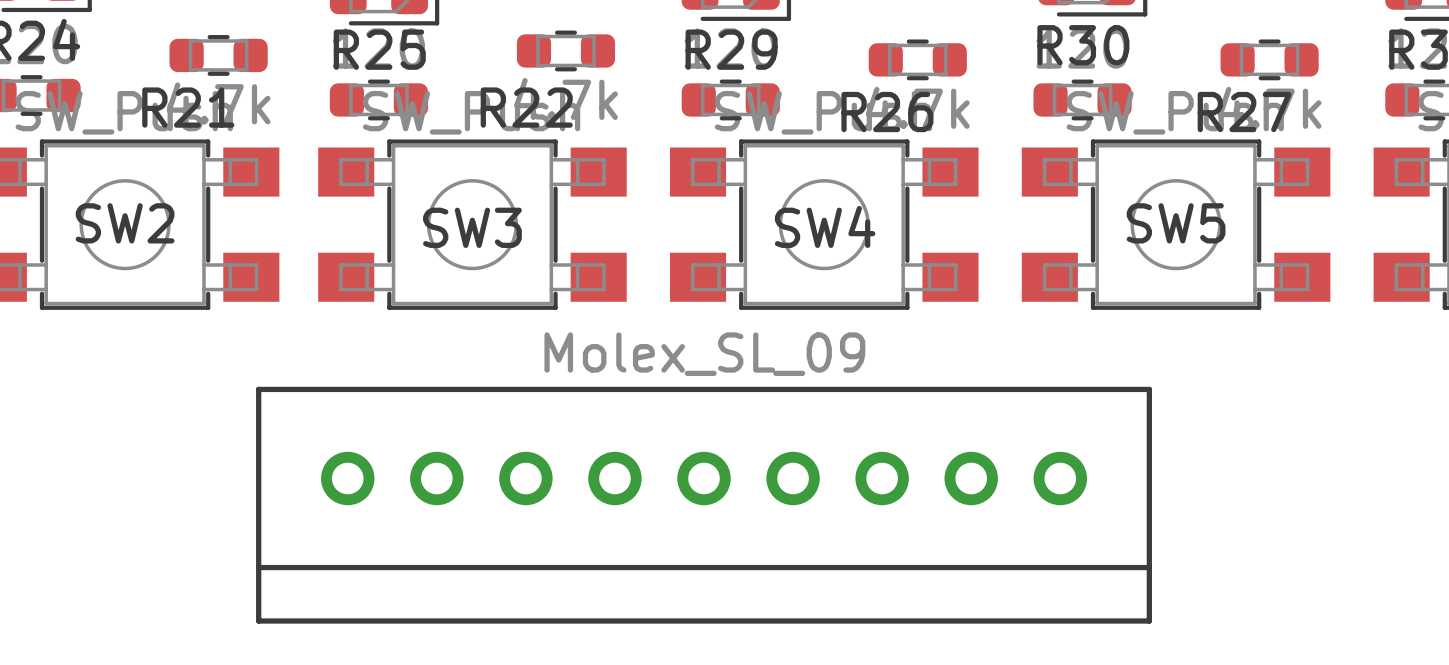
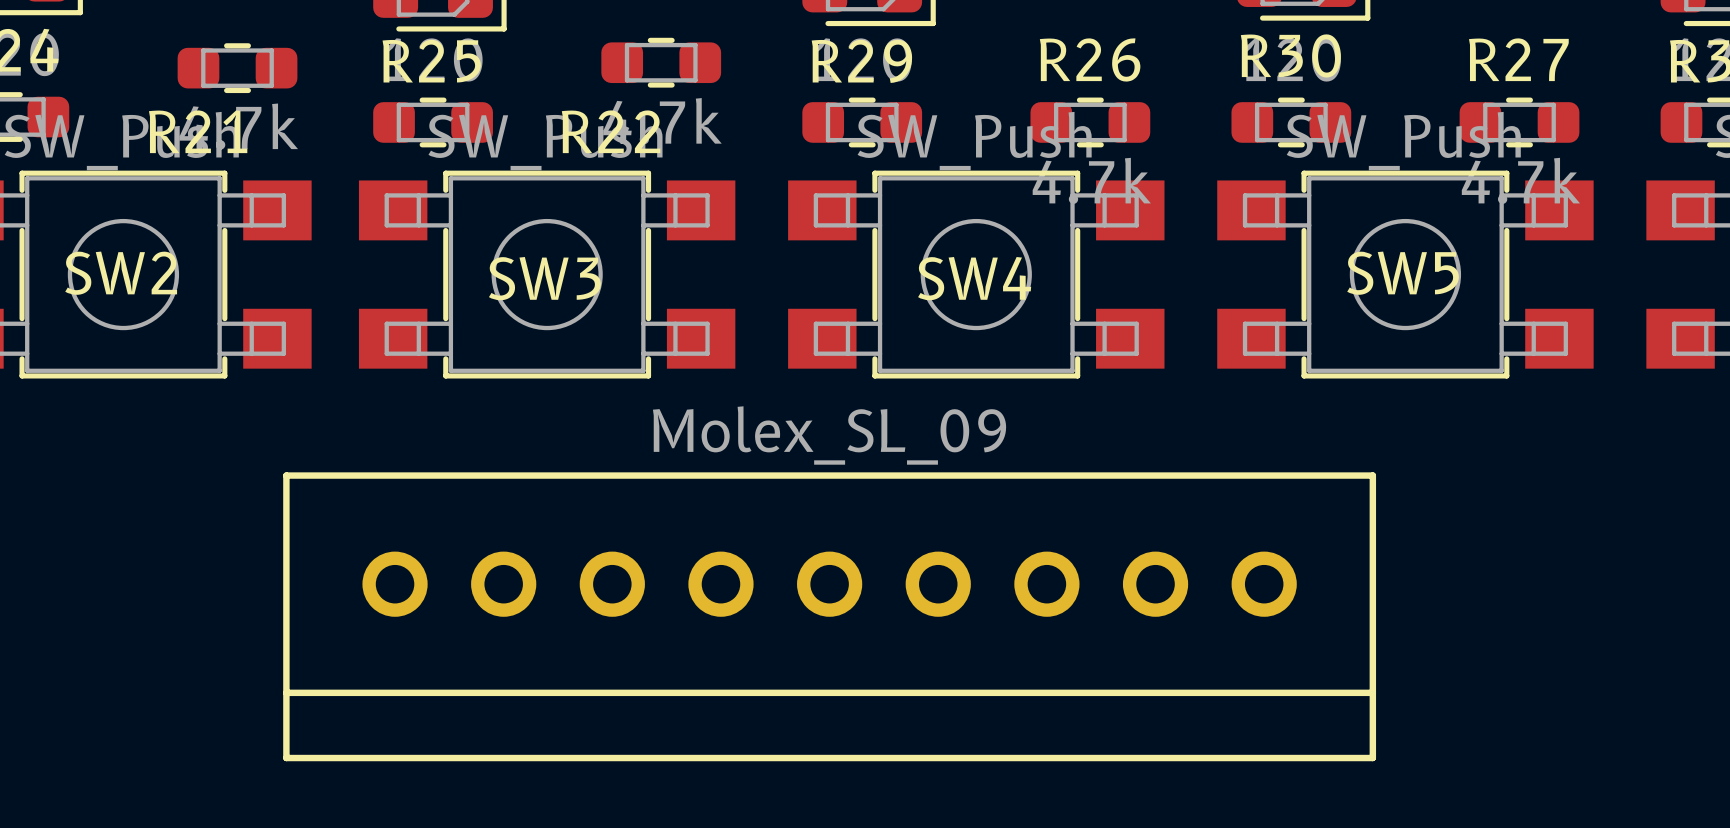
R26 position: (917, 59) -> (1090, 122)
R27 position: (1269, 59) -> (1519, 122)
R26 name position: R26 (887, 112) -> R26 (1090, 59)
R27 name position: R27 (1244, 112) -> R27 (1518, 59)

